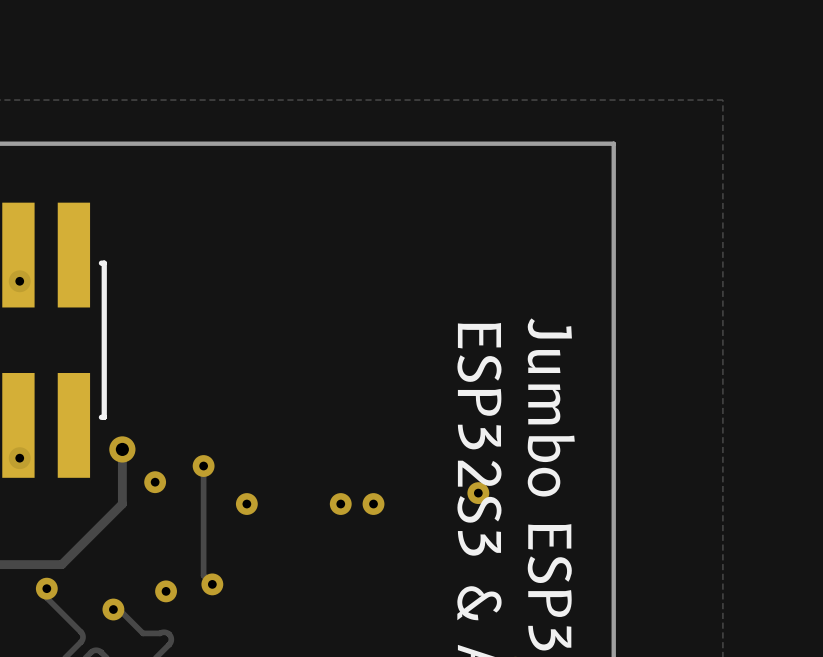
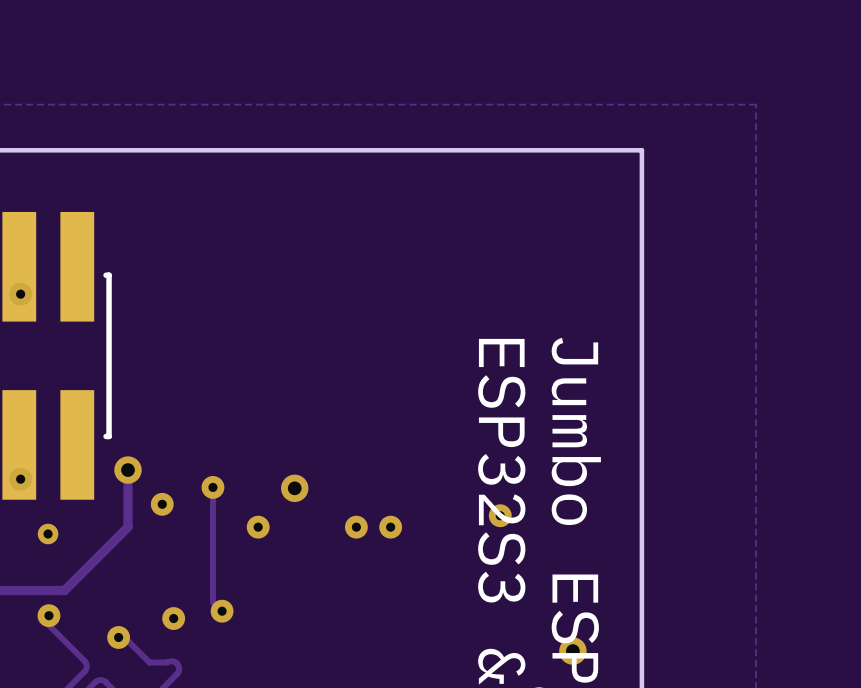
via: none -> (294, 488)
via: none -> (48, 534)
via: none -> (572, 651)

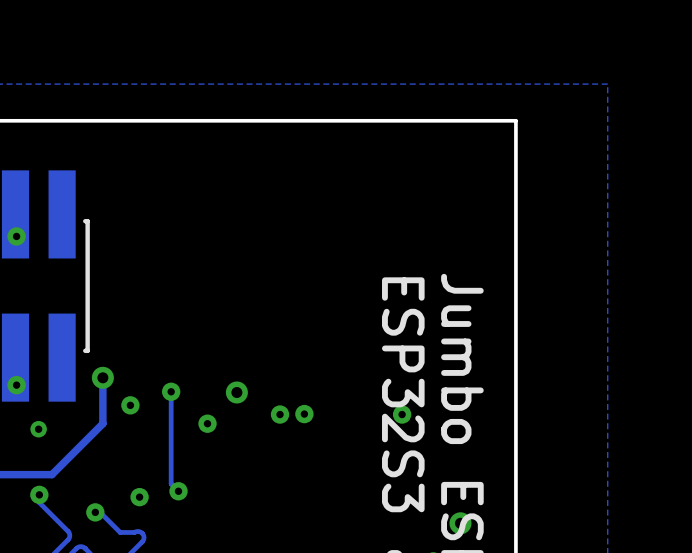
via: none -> (280, 414)
via: none -> (304, 414)
via: (356, 527) -> none
via: (390, 527) -> none

